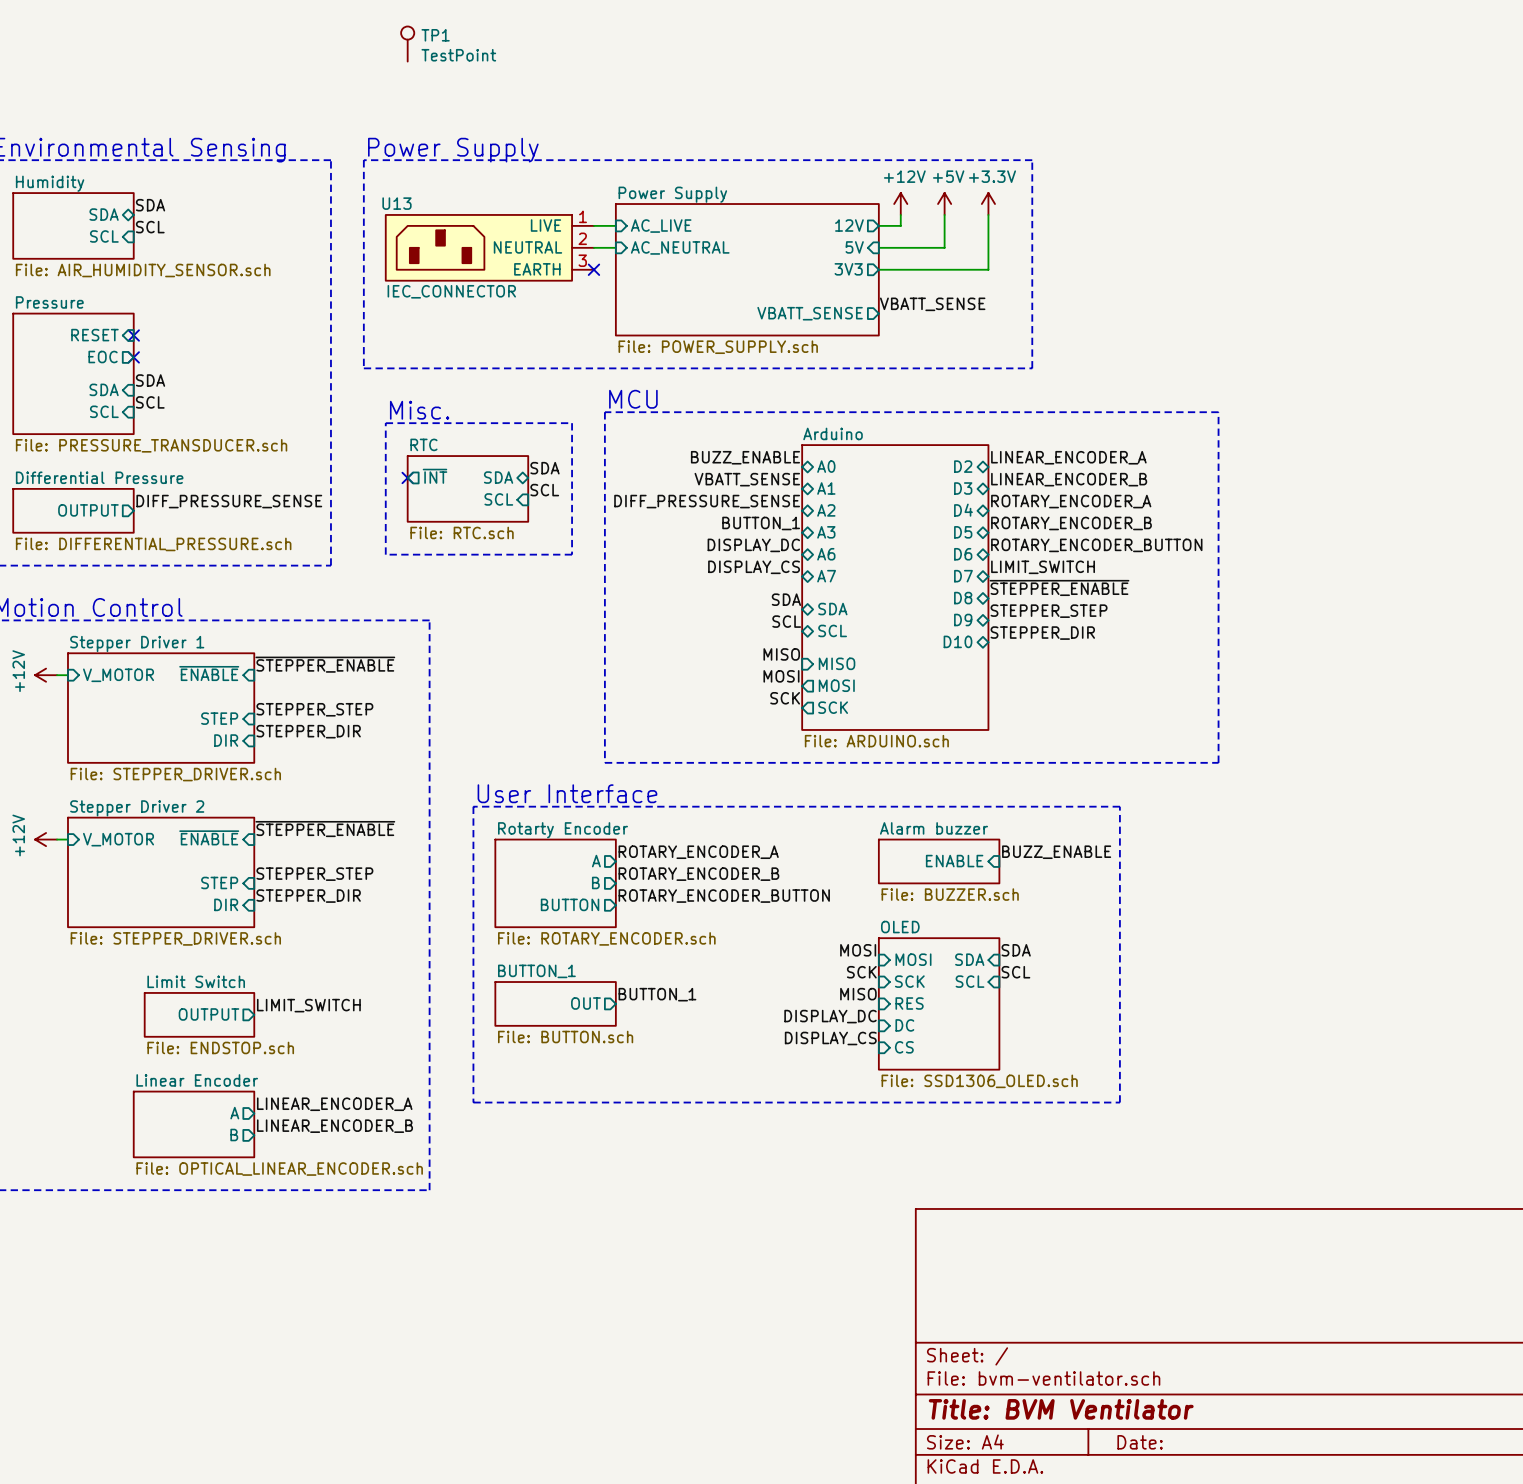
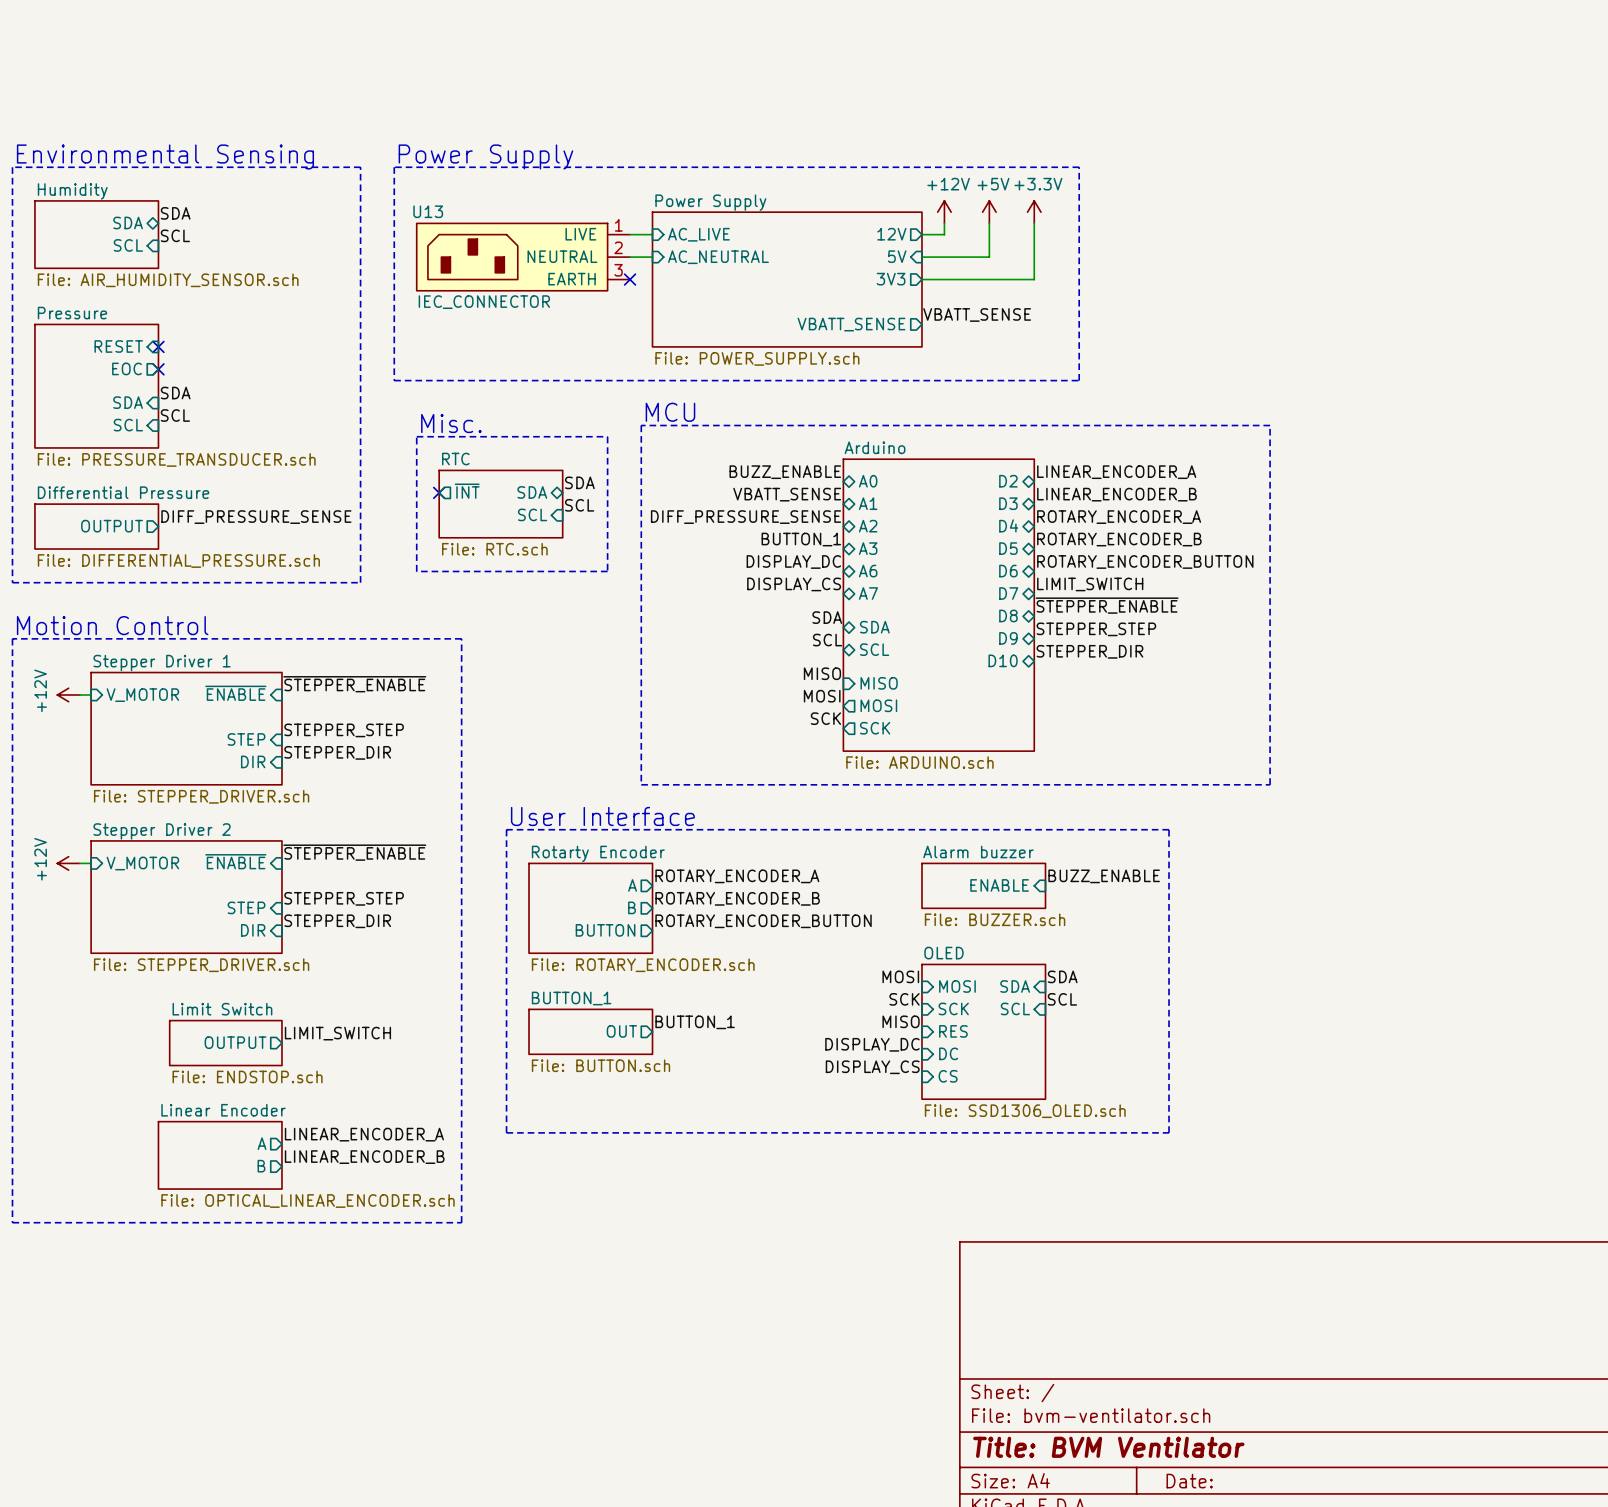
TP1: TestPoint (407, 44) -> none

